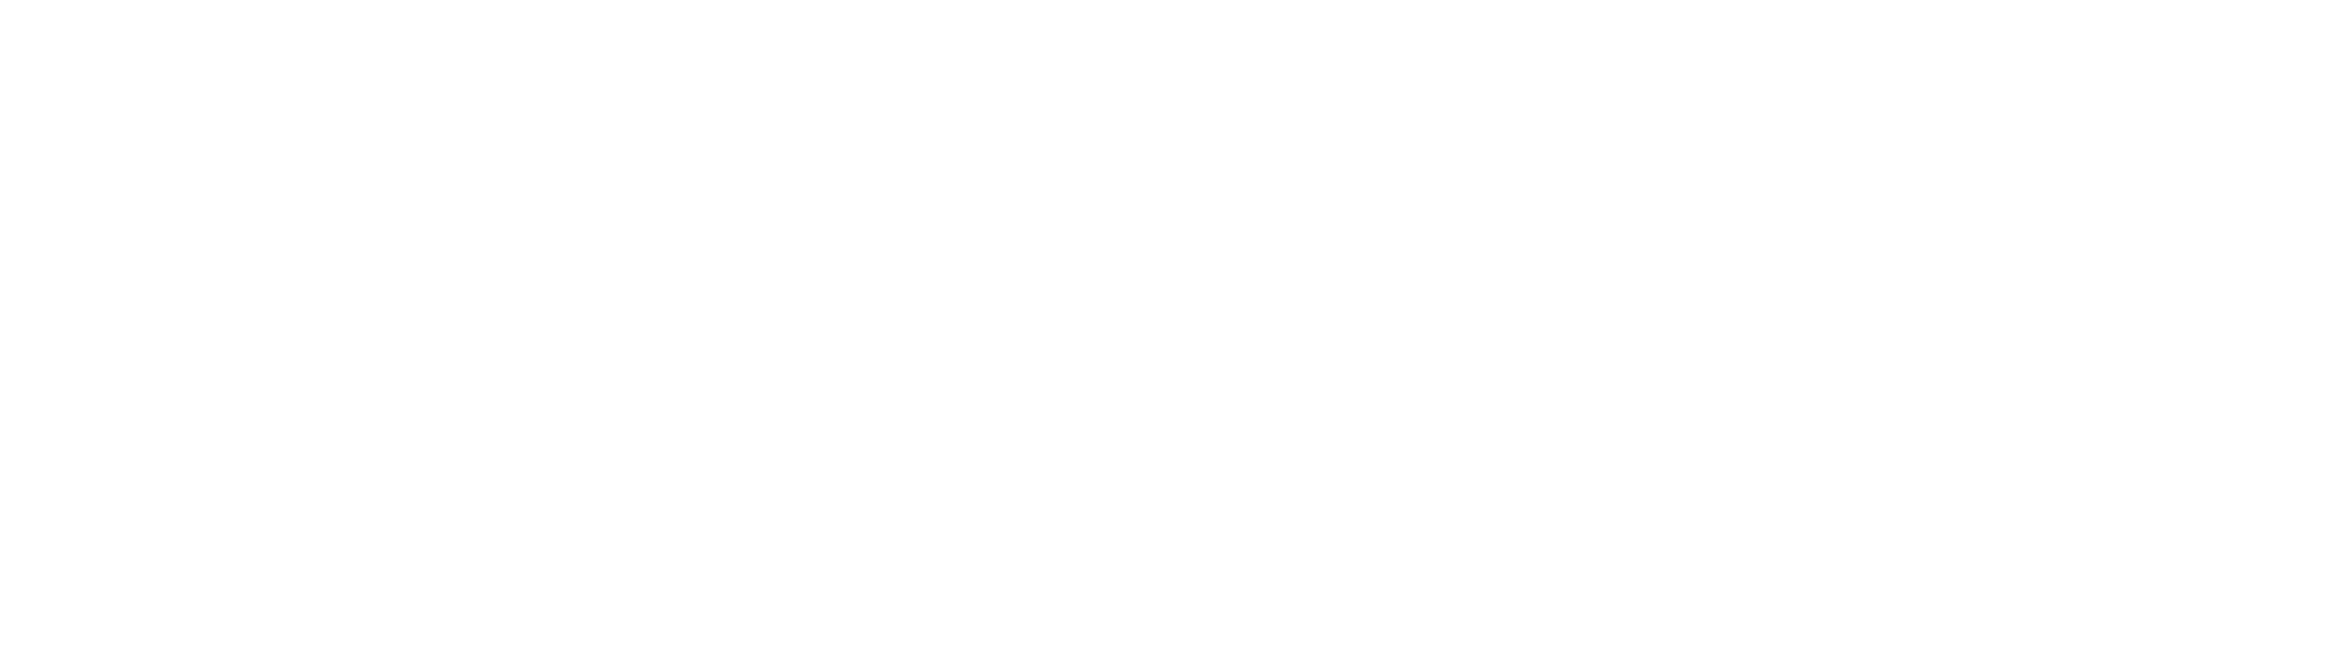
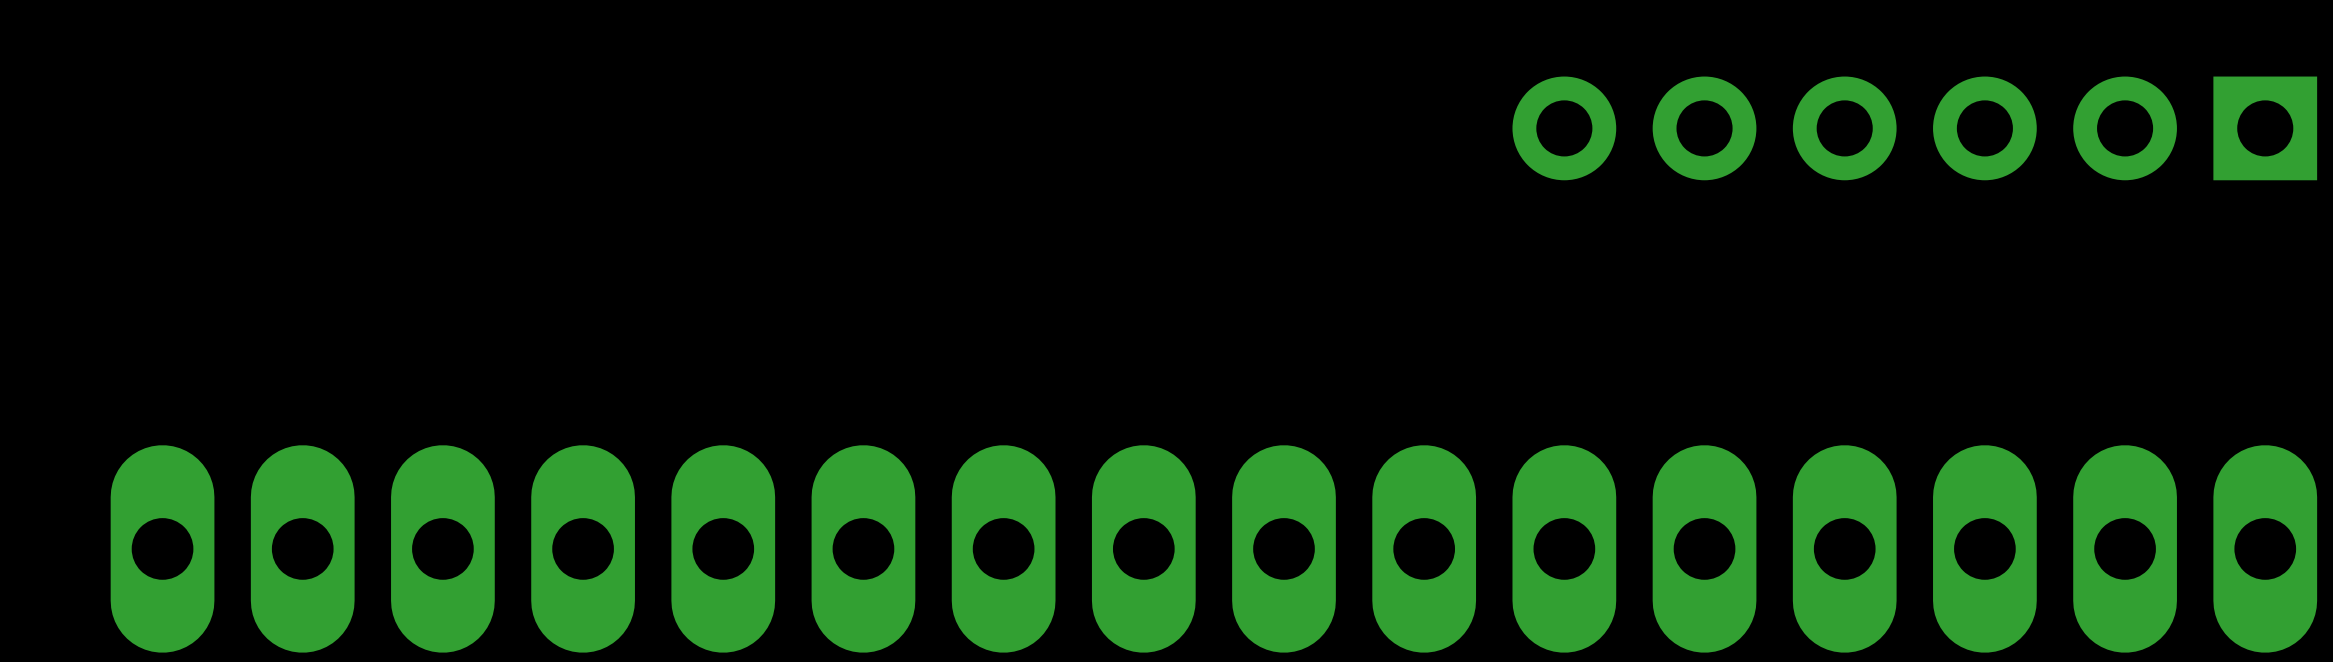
part: none -> (1914, 128)
part: none -> (1213, 548)

